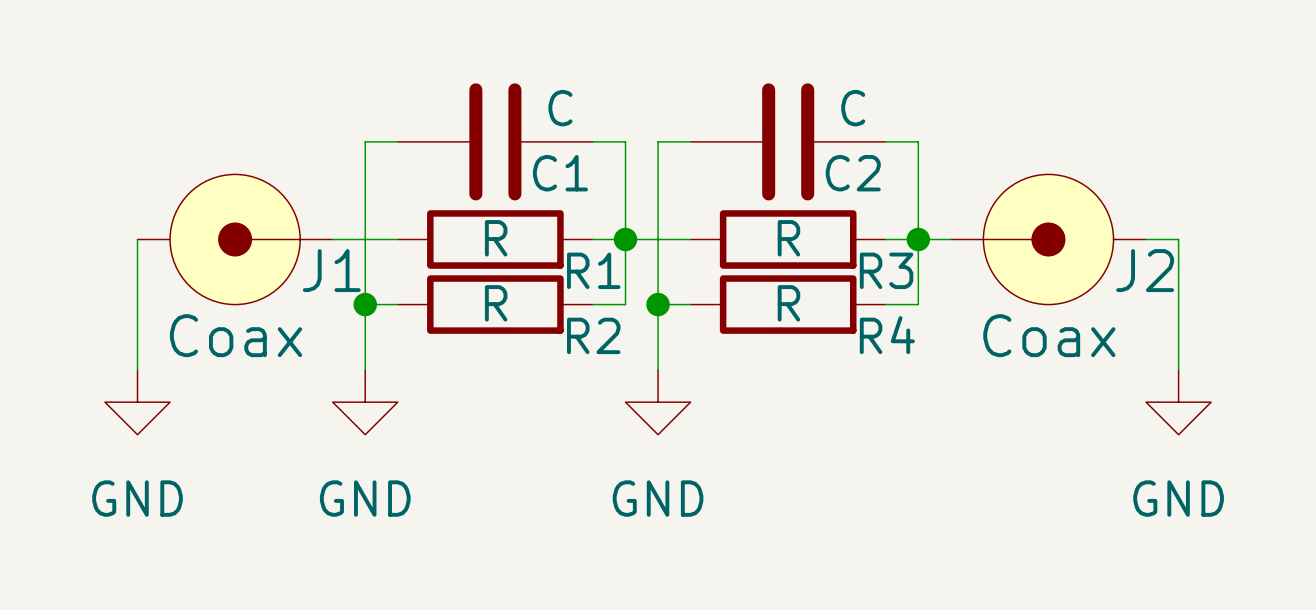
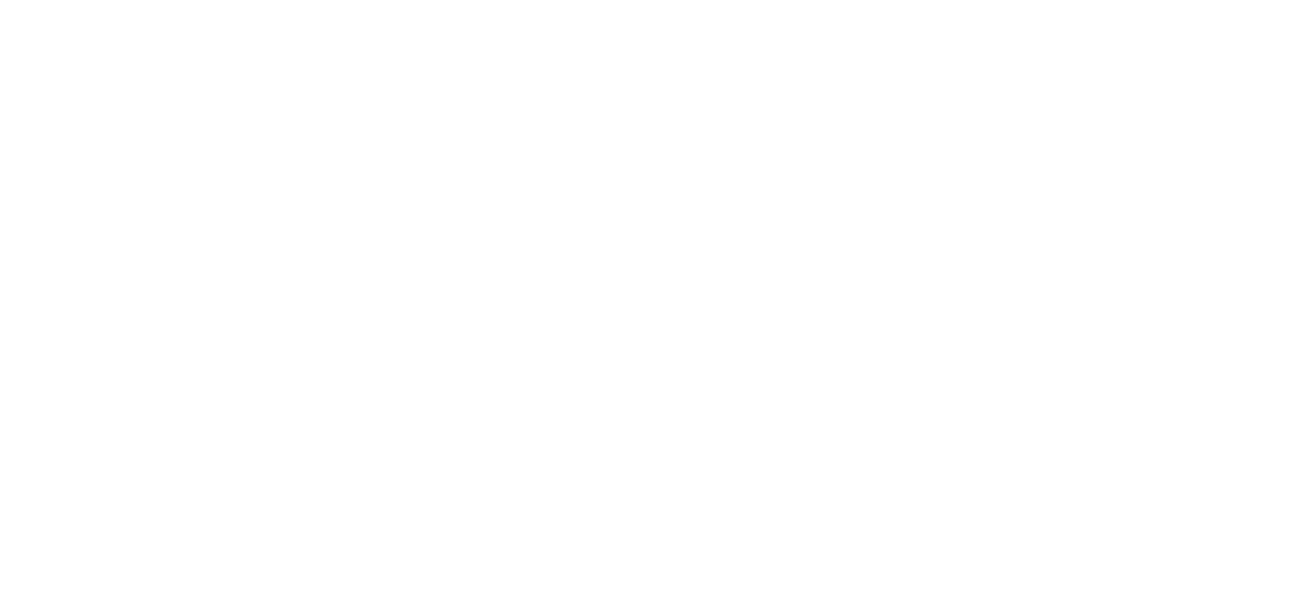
wire: (397, 141) (365, 141) (365, 369) -> none
C1: C (495, 141) -> none
wire: (592, 141) (625, 141) (625, 304) (592, 304) -> none
wire: (690, 141) (658, 141) (658, 369) -> none
C2: C (788, 141) -> none
wire: (885, 141) (918, 141) (918, 304) (885, 304) -> none
wire: (137, 239) (137, 369) -> none
J1: Coax (235, 239) -> none
wire: (332, 239) (397, 239) -> none
R1: R (495, 239) -> none
wire: (592, 239) (690, 239) -> none
junction: (625, 239) -> none
R3: R (788, 239) -> none
wire: (885, 239) (950, 239) -> none
junction: (918, 239) -> none
J2: Coax (1048, 239) -> none
wire: (1146, 239) (1178, 239) (1178, 369) -> none
wire: (365, 304) (397, 304) -> none
junction: (365, 304) -> none
R2: R (495, 304) -> none
wire: (658, 304) (690, 304) -> none
junction: (658, 304) -> none
R4: R (788, 304) -> none
power symbol: GND (137, 402) -> none
power symbol: GND (365, 402) -> none
power symbol: GND (658, 402) -> none
power symbol: GND (1178, 402) -> none

